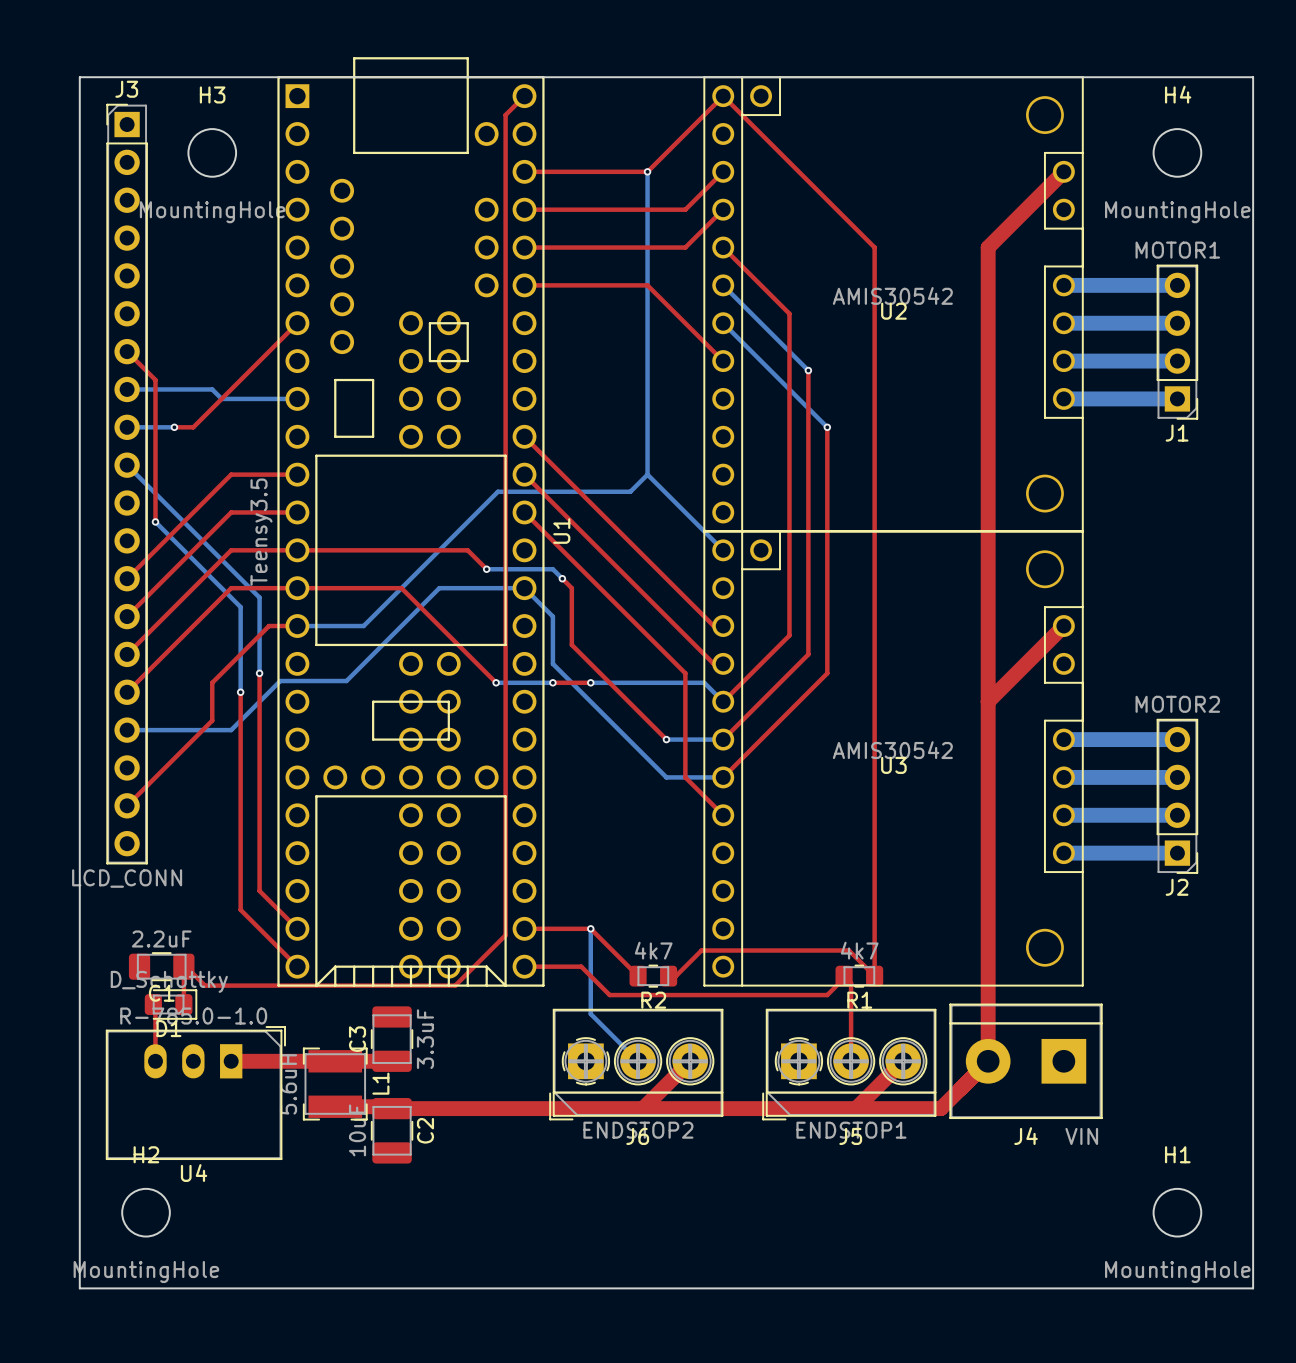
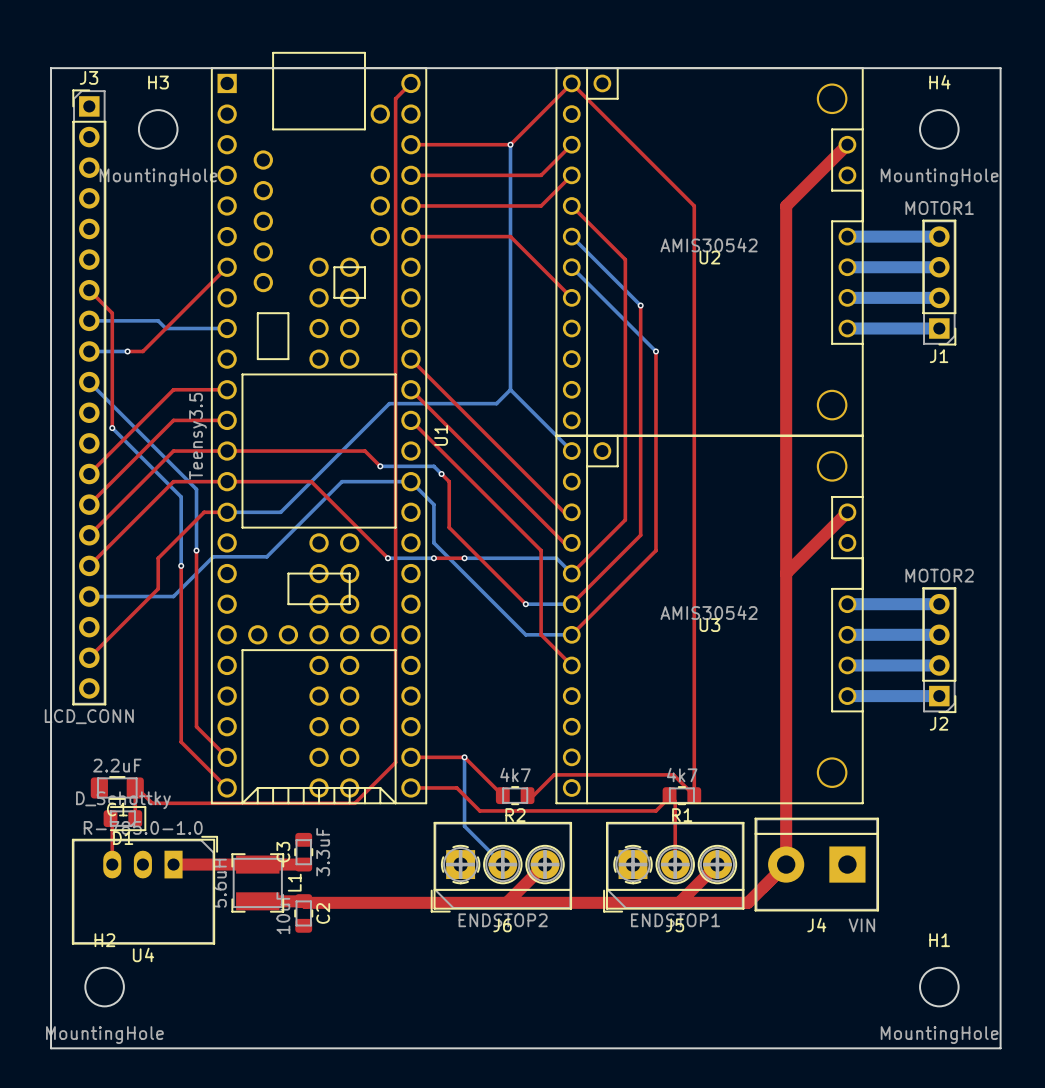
C3 footprint: [370, 1006, 414, 1072] -> [294, 832, 314, 872]
C2 footprint: [370, 1097, 414, 1164] -> [294, 894, 314, 933]

